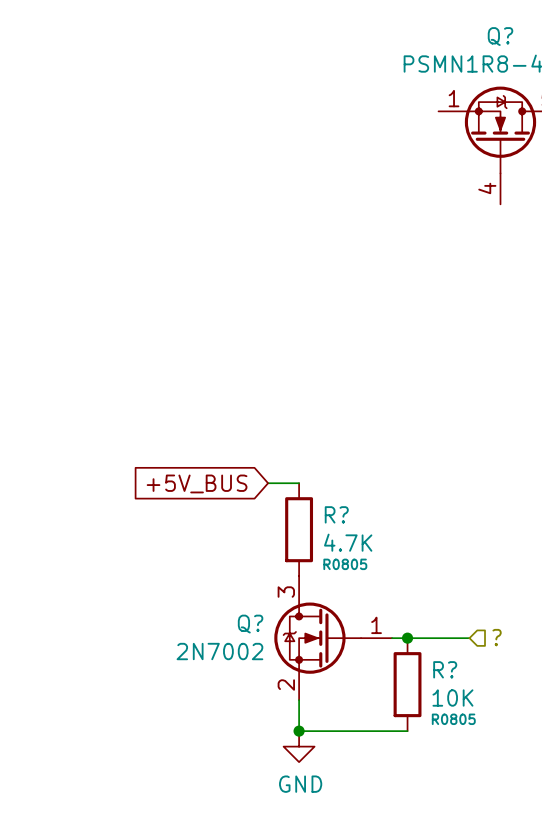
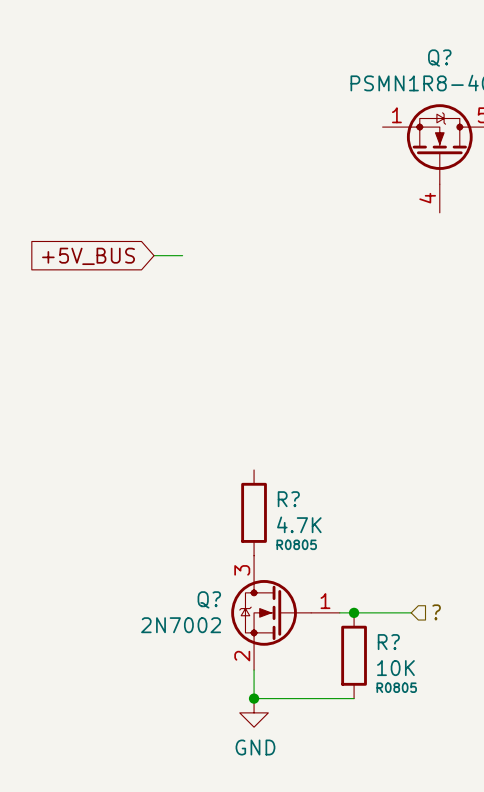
global label position: +5V_BUS (197, 483) -> +5V_BUS (88, 256)
wire: (268, 483) (299, 483) -> (154, 255) (182, 255)

